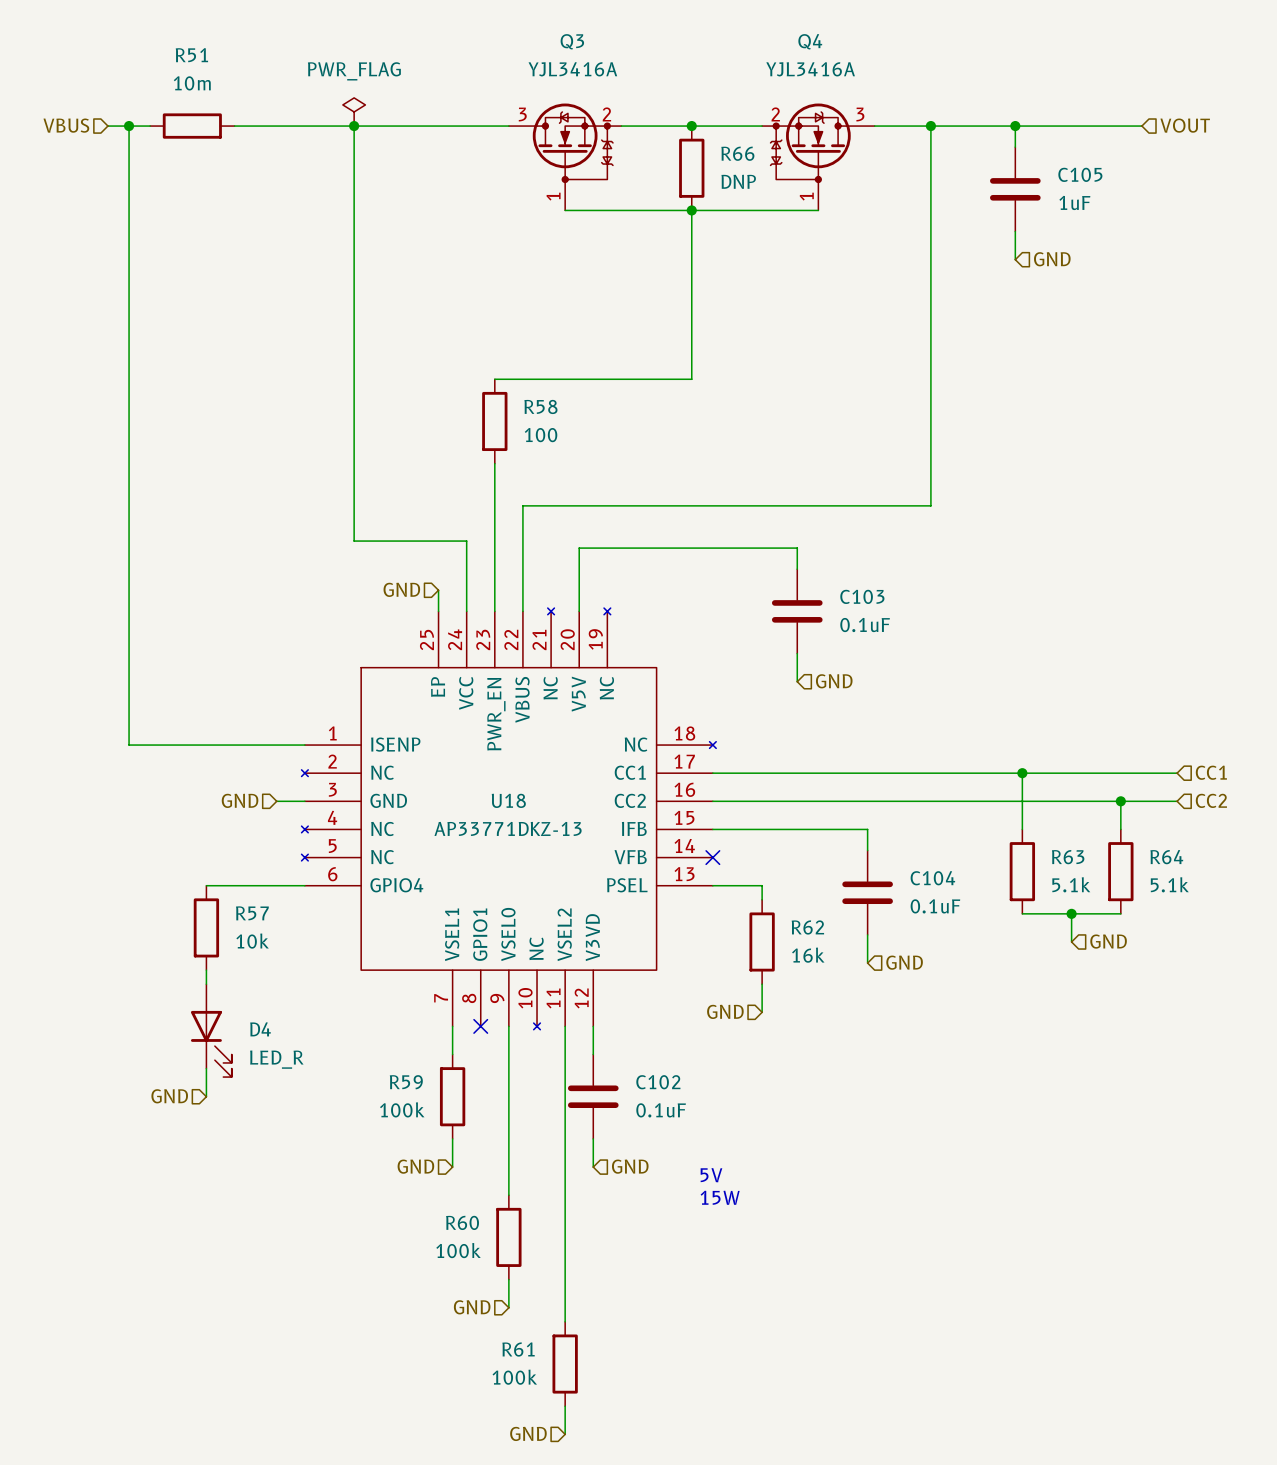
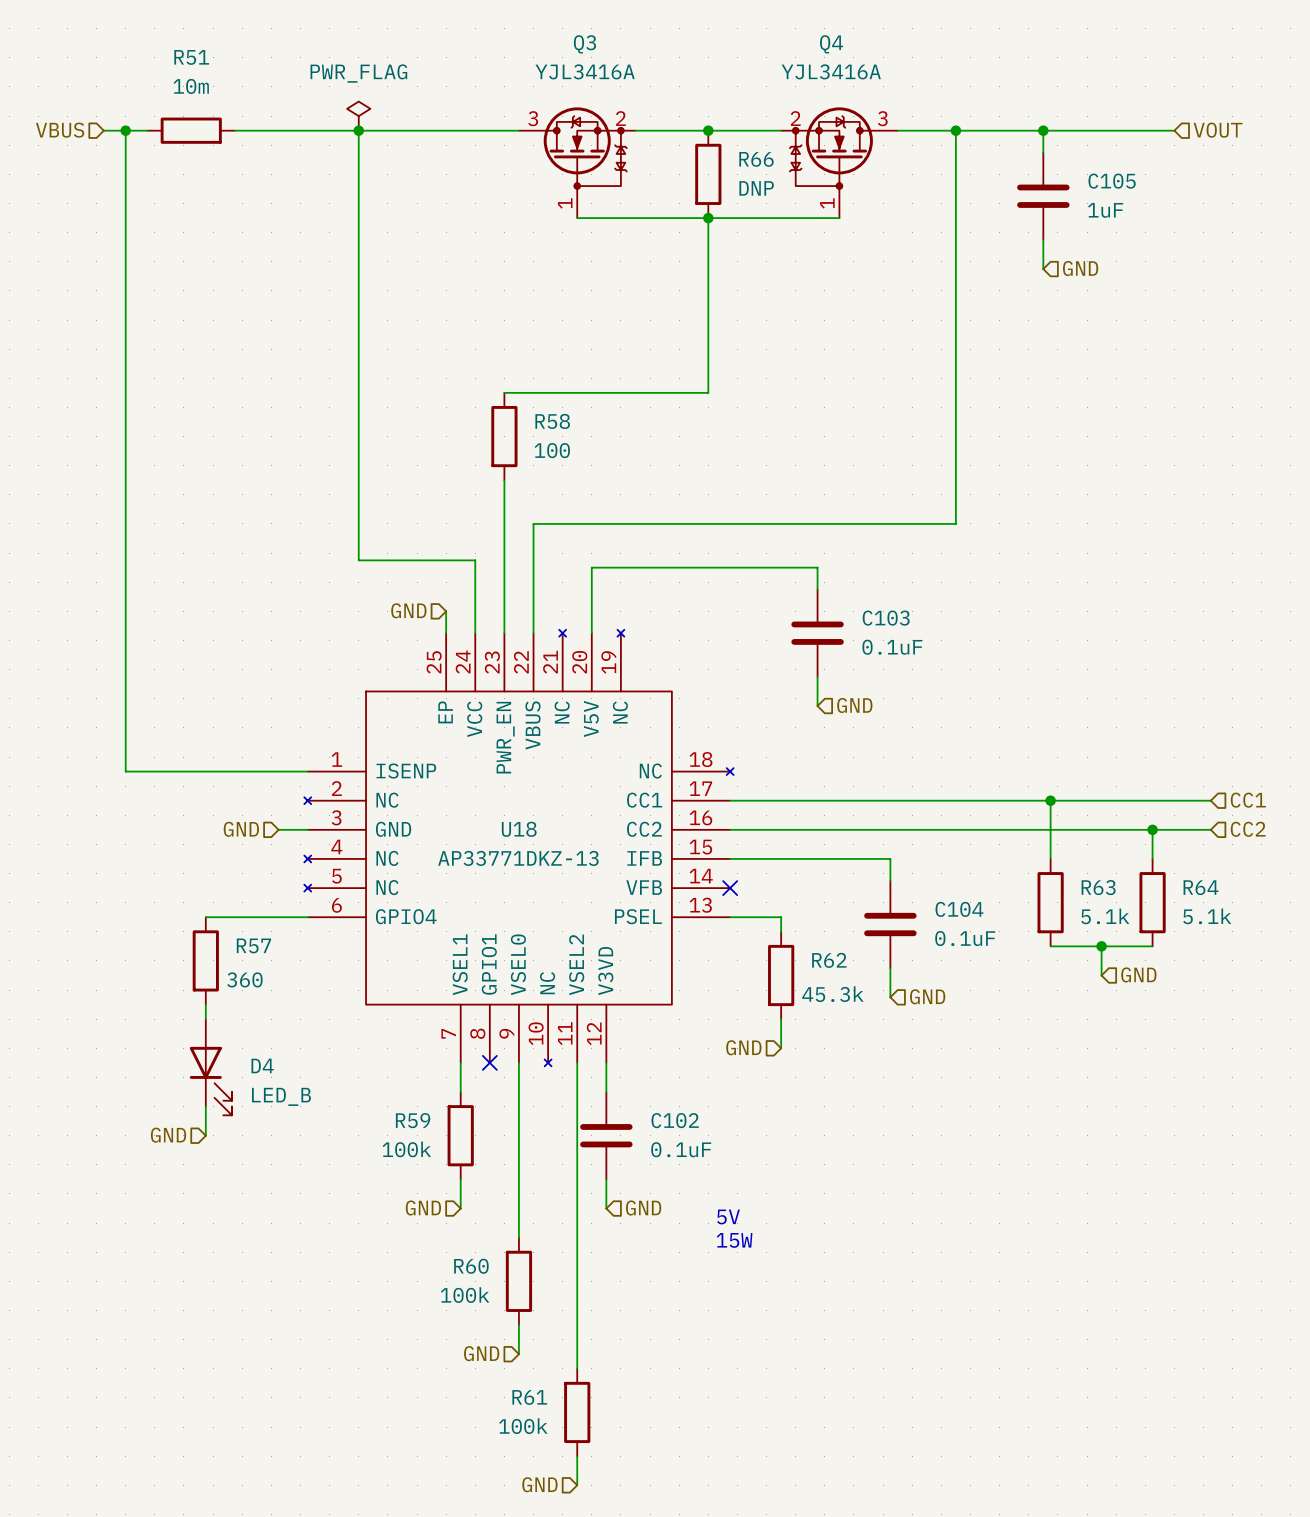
R57 value: 10k (252, 941) -> 360 (244, 979)
R62 value: 16k (808, 955) -> 45.3k (832, 994)
D4 value: LED_R (276, 1059) -> LED_B (281, 1096)

